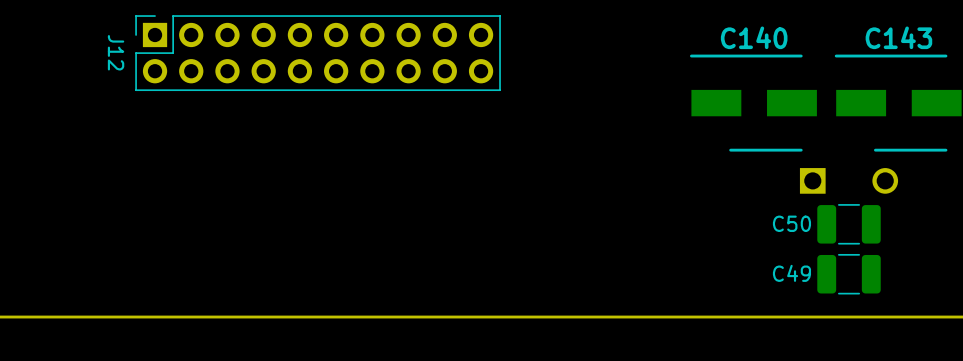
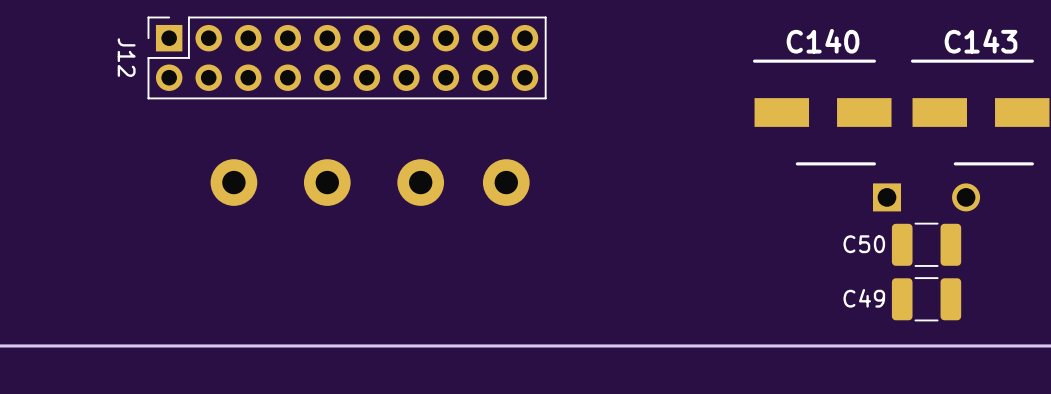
part: none -> (233, 182)
part: none -> (327, 182)
part: none -> (420, 182)
part: none -> (506, 182)

